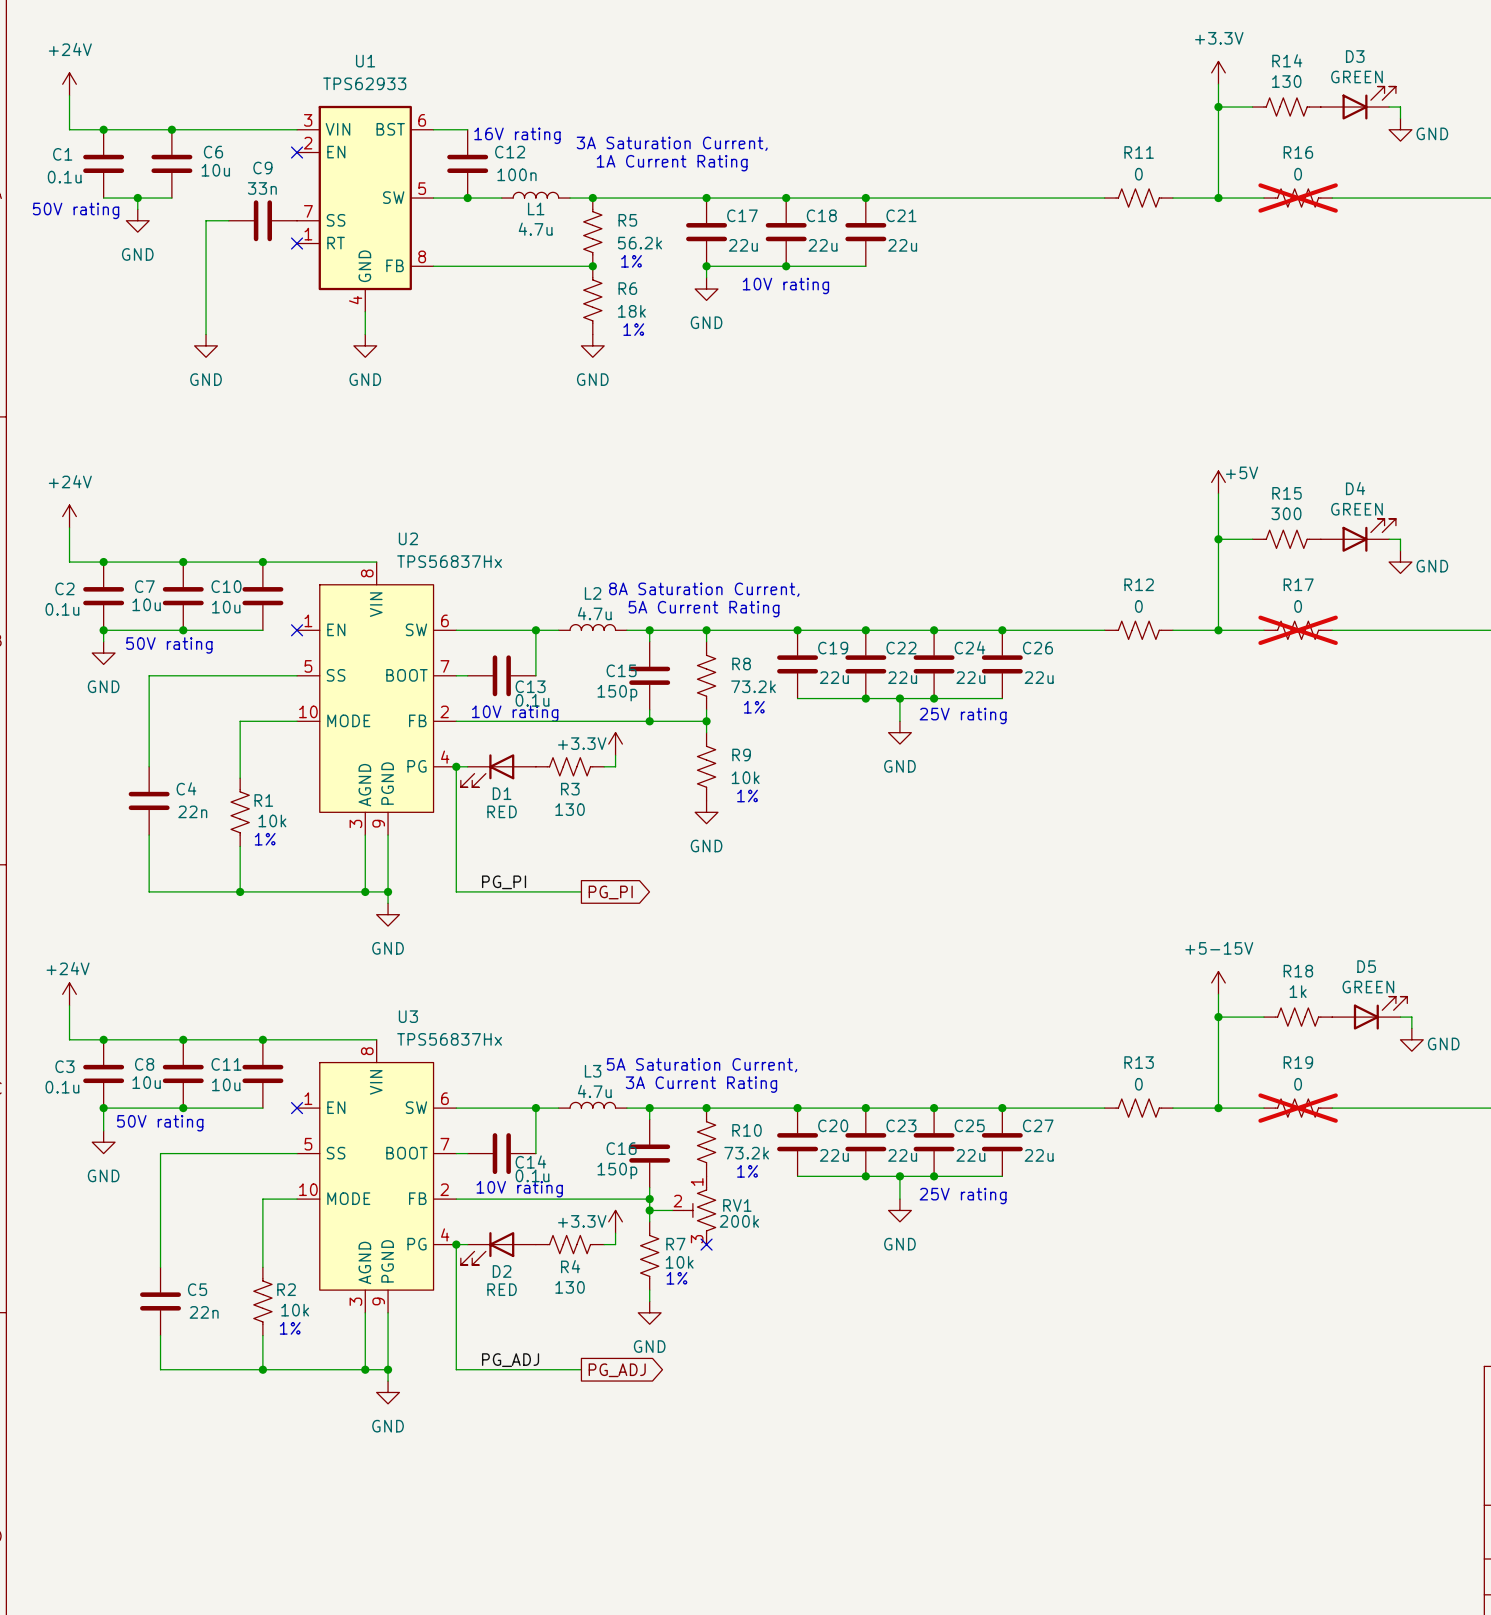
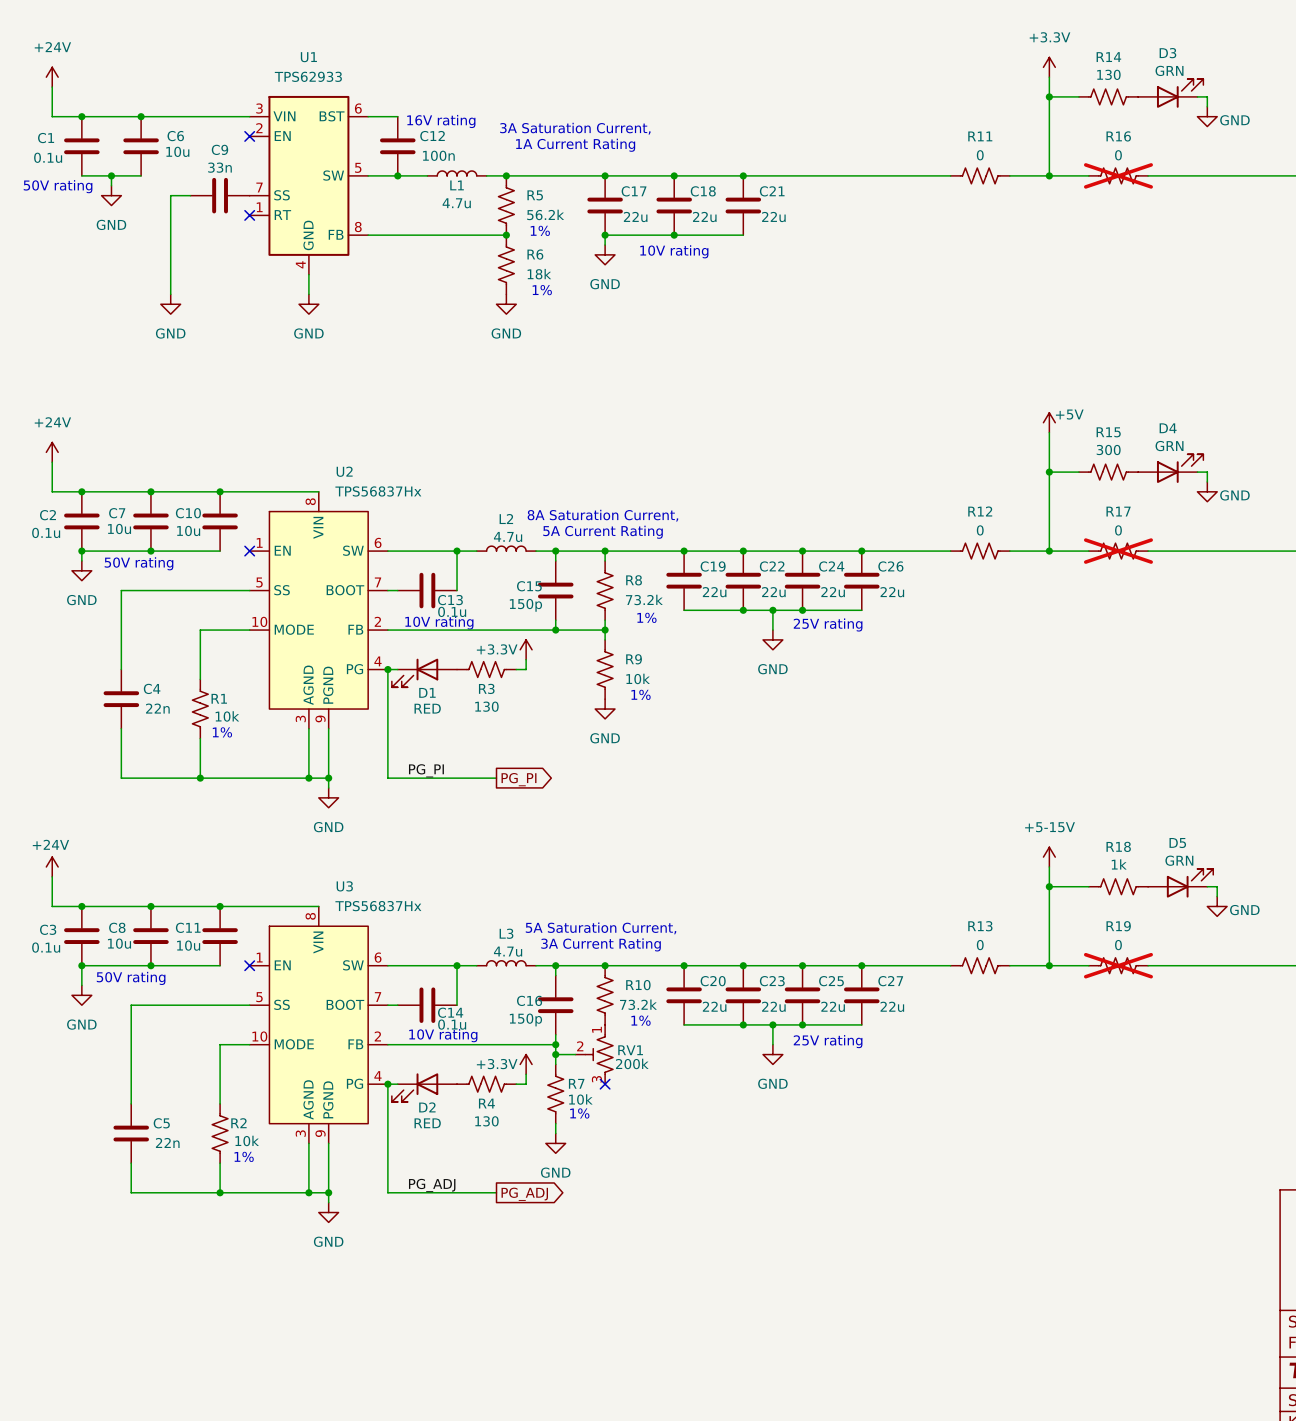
D3 value: GREEN (1356, 77) -> GRN (1169, 70)
D4 value: GREEN (1356, 509) -> GRN (1169, 446)
D5 value: GREEN (1368, 987) -> GRN (1179, 860)

